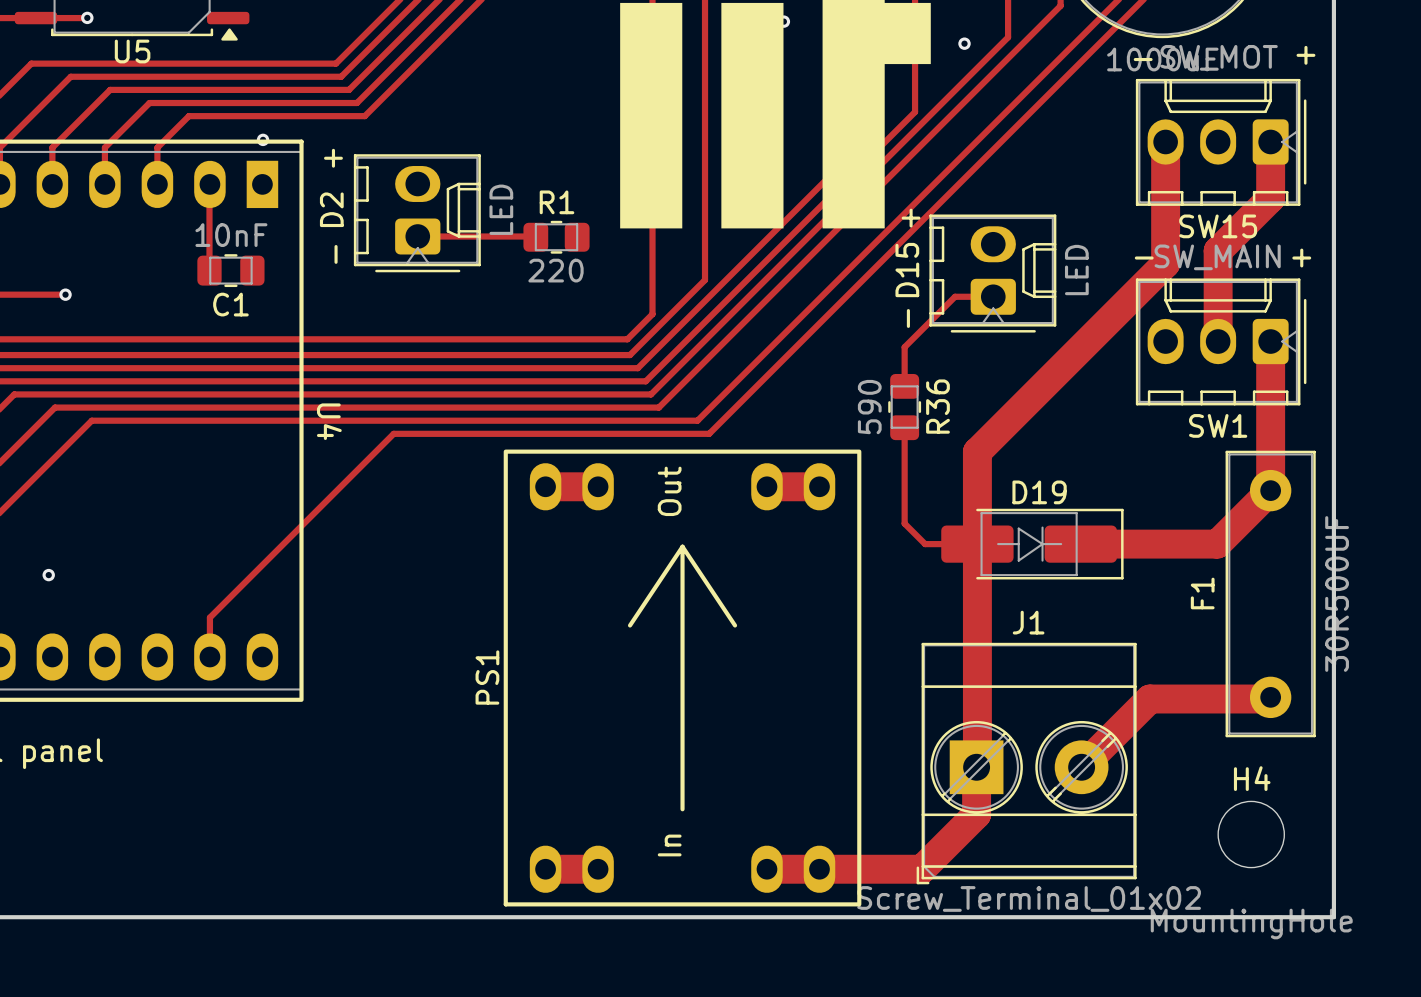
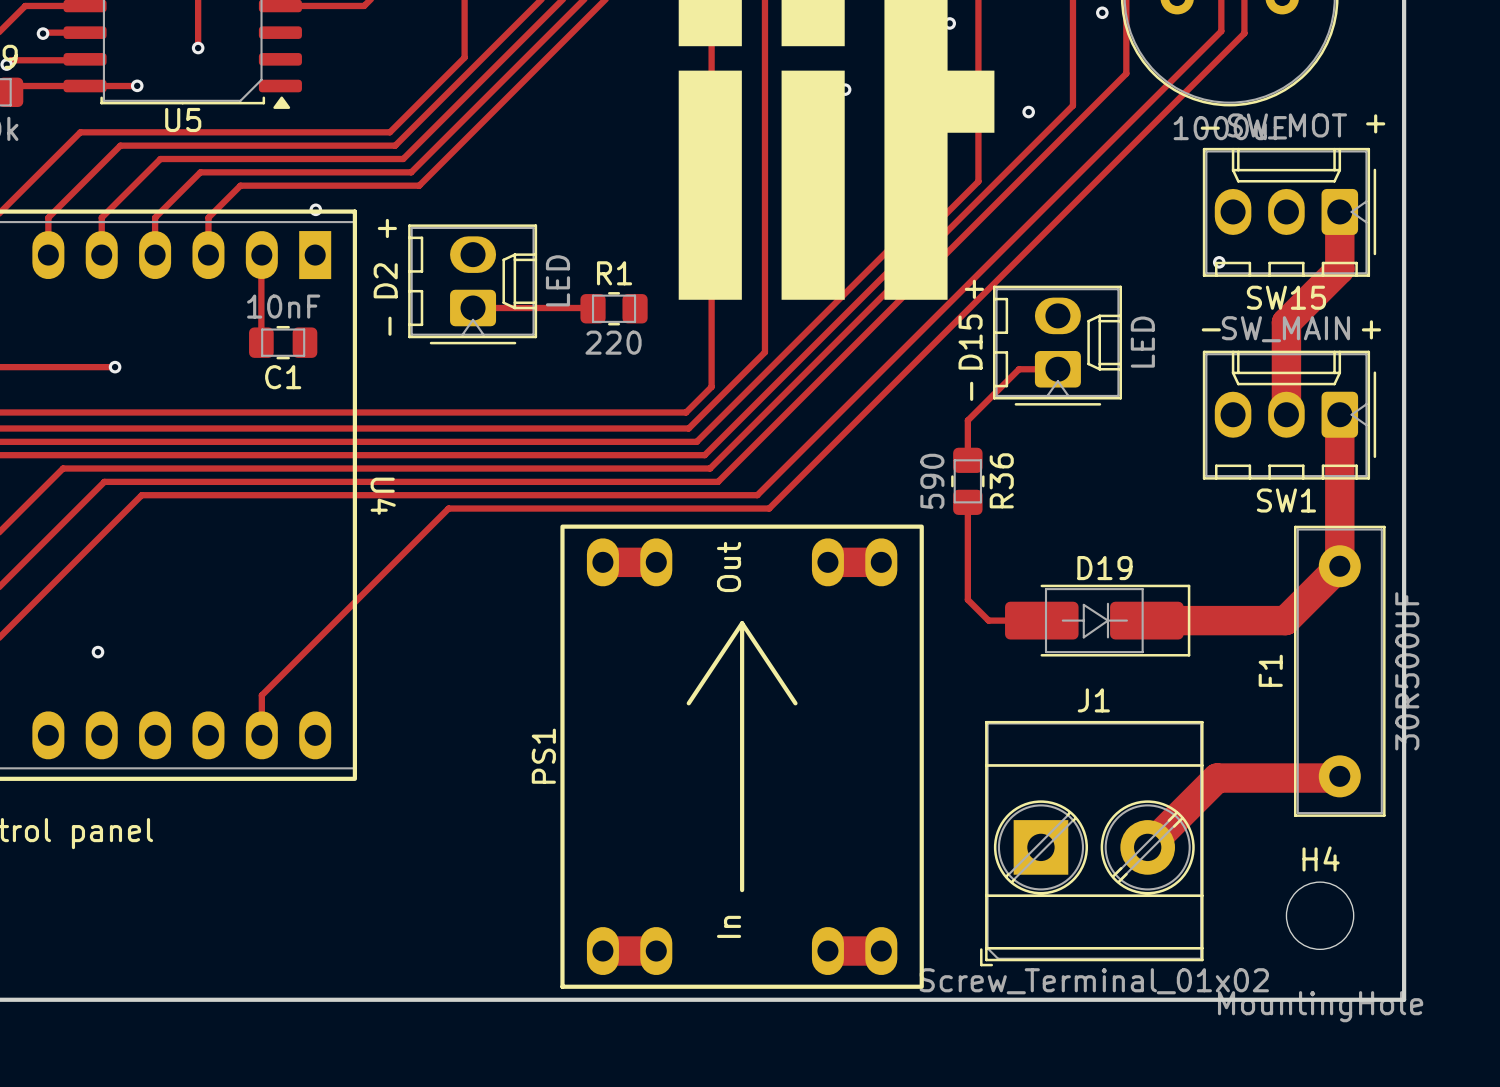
track: (1165, 141) (1165, 263) (977, 451) (977, 766) -> none
via: none -> (1219, 262)
track: (976, 767) (976, 814) (921, 869) (819, 869) -> none

